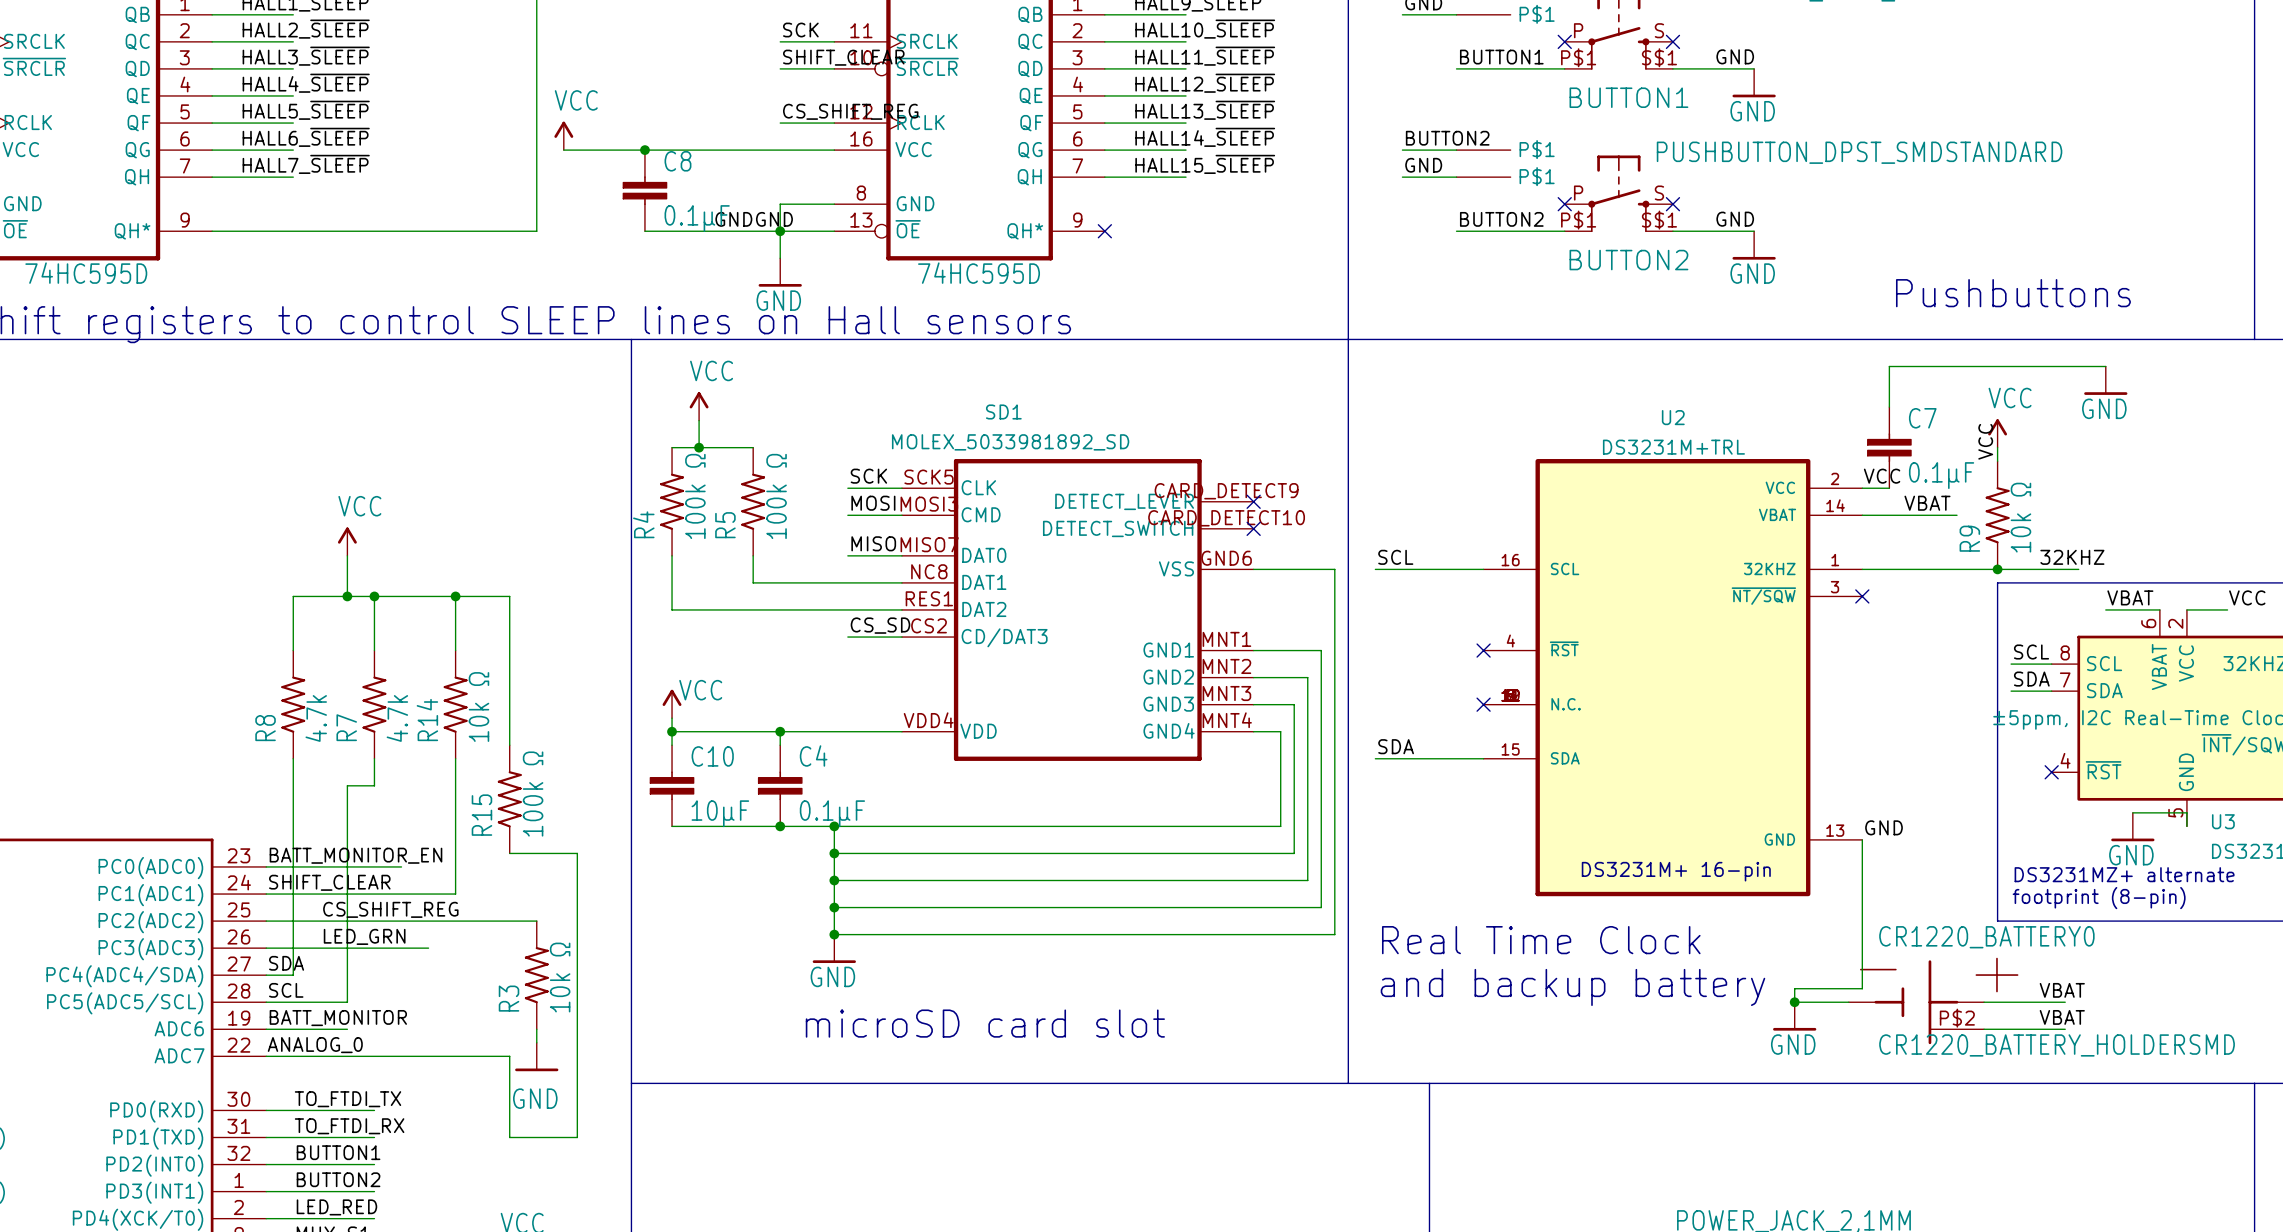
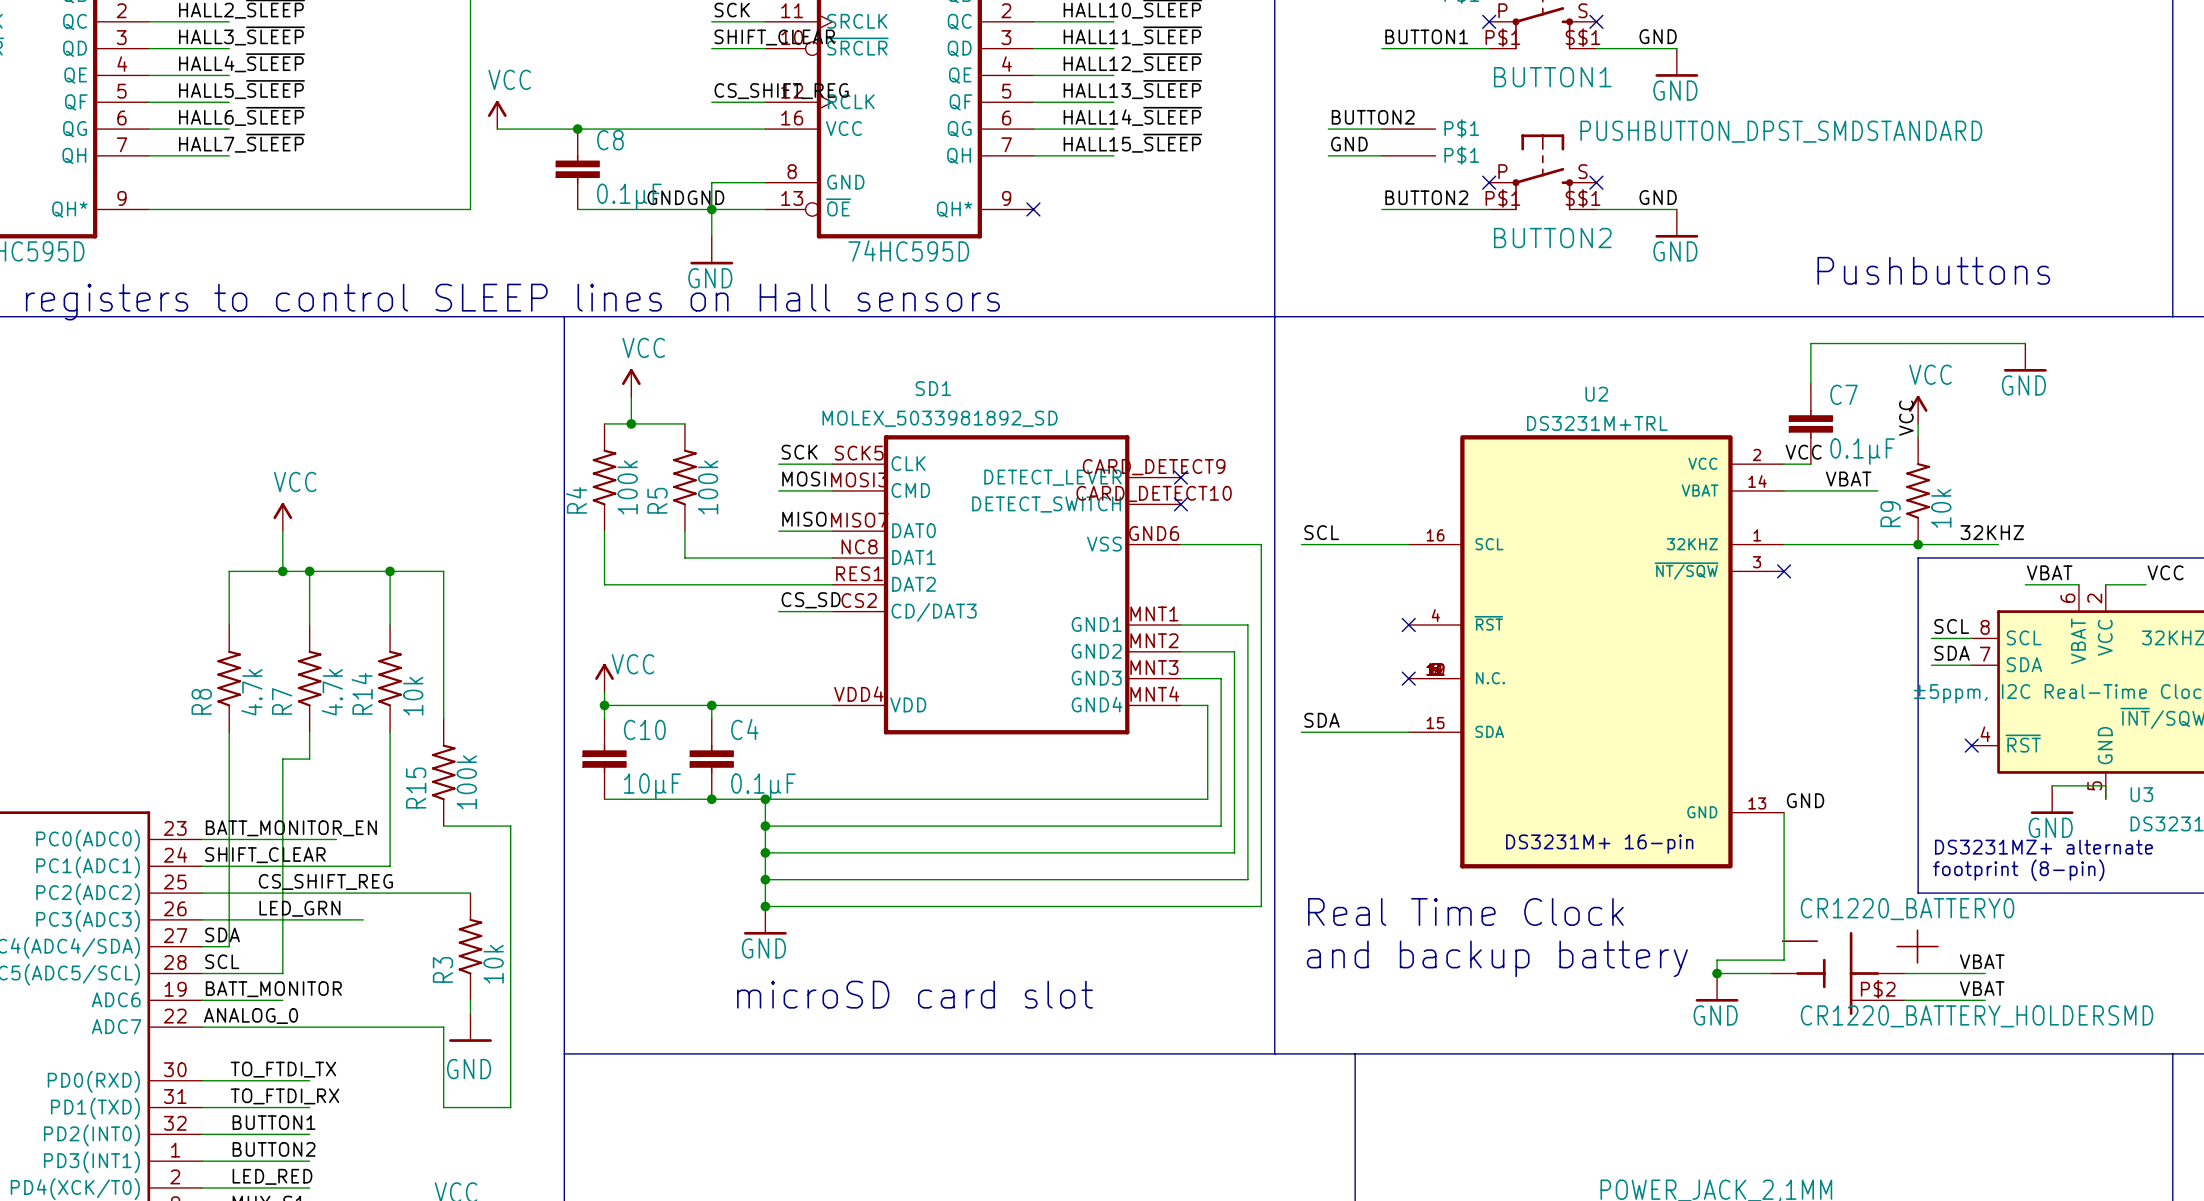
R4 value: 100k Ω (695, 496) -> 100k (627, 487)
R5 value: 100k Ω (776, 496) -> 100k (708, 487)
R9 value: 10k Ω (2020, 517) -> 10k (1941, 508)
R14 value: 10k Ω (478, 706) -> 10k (413, 696)
R15 value: 100k Ω (533, 794) -> 100k (466, 782)
R3 value: 10k Ω (560, 977) -> 10k (493, 964)

